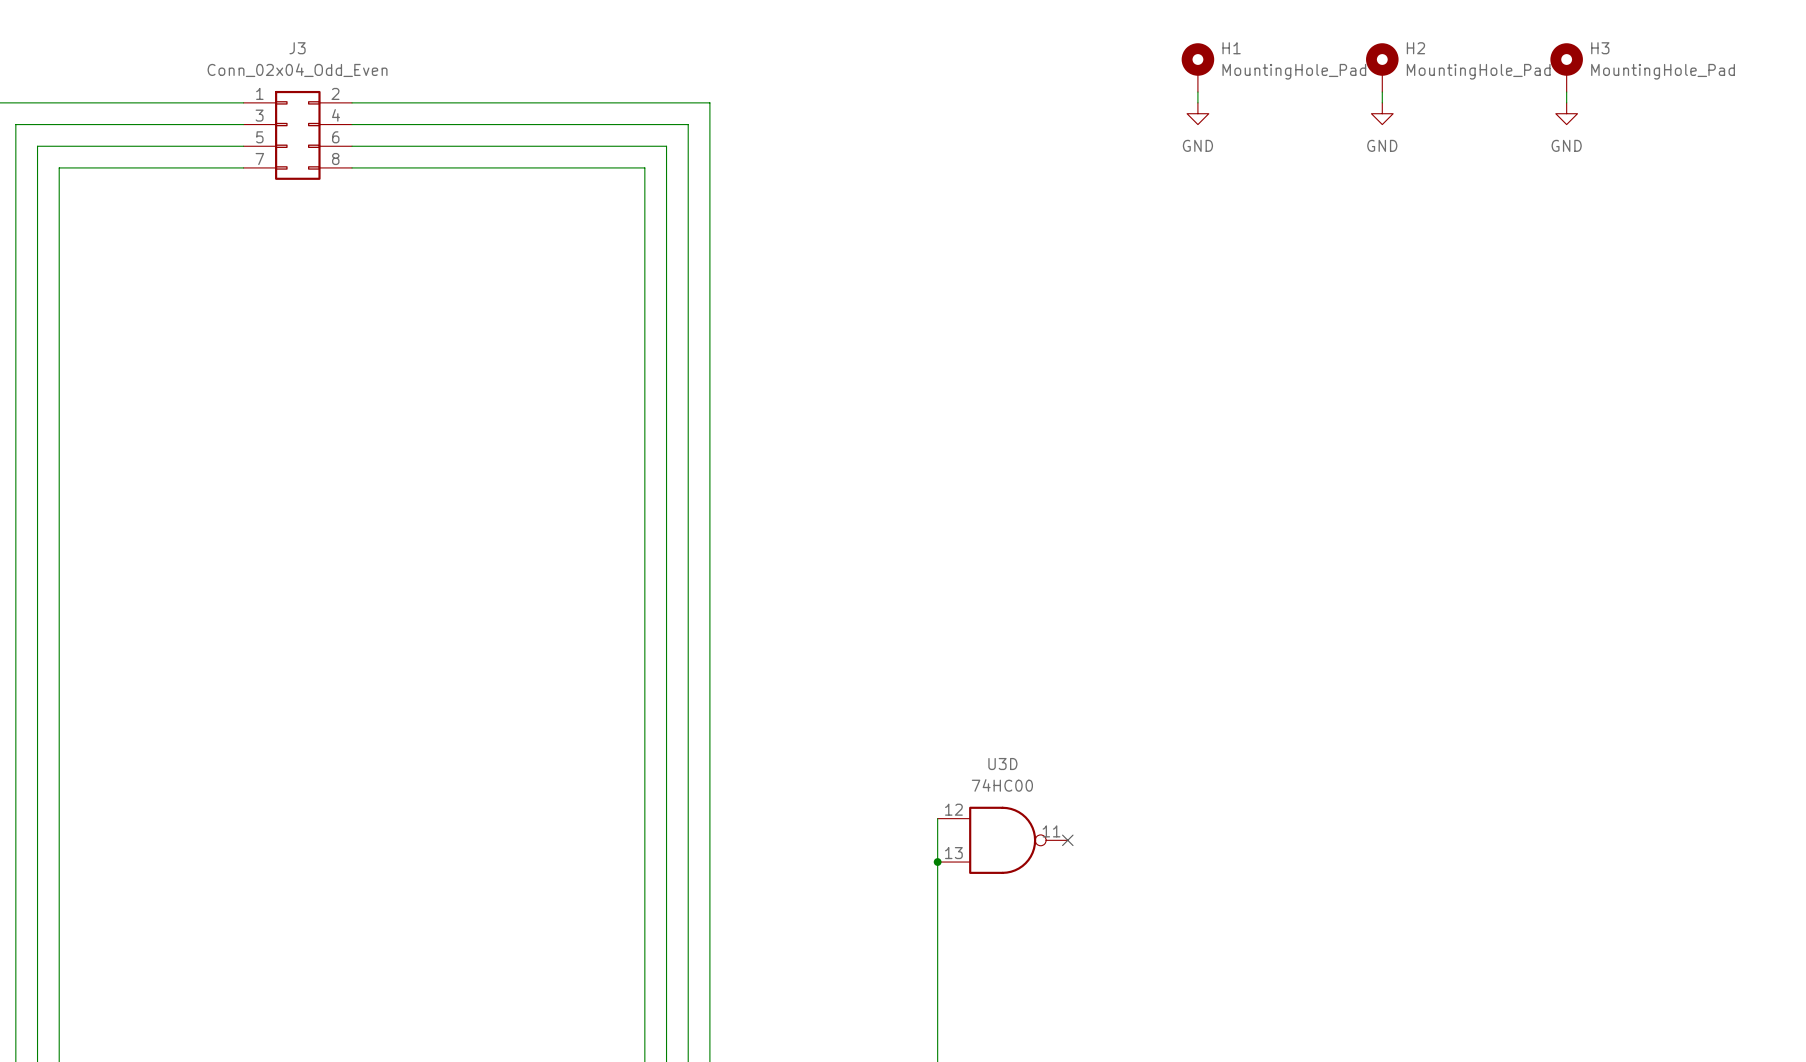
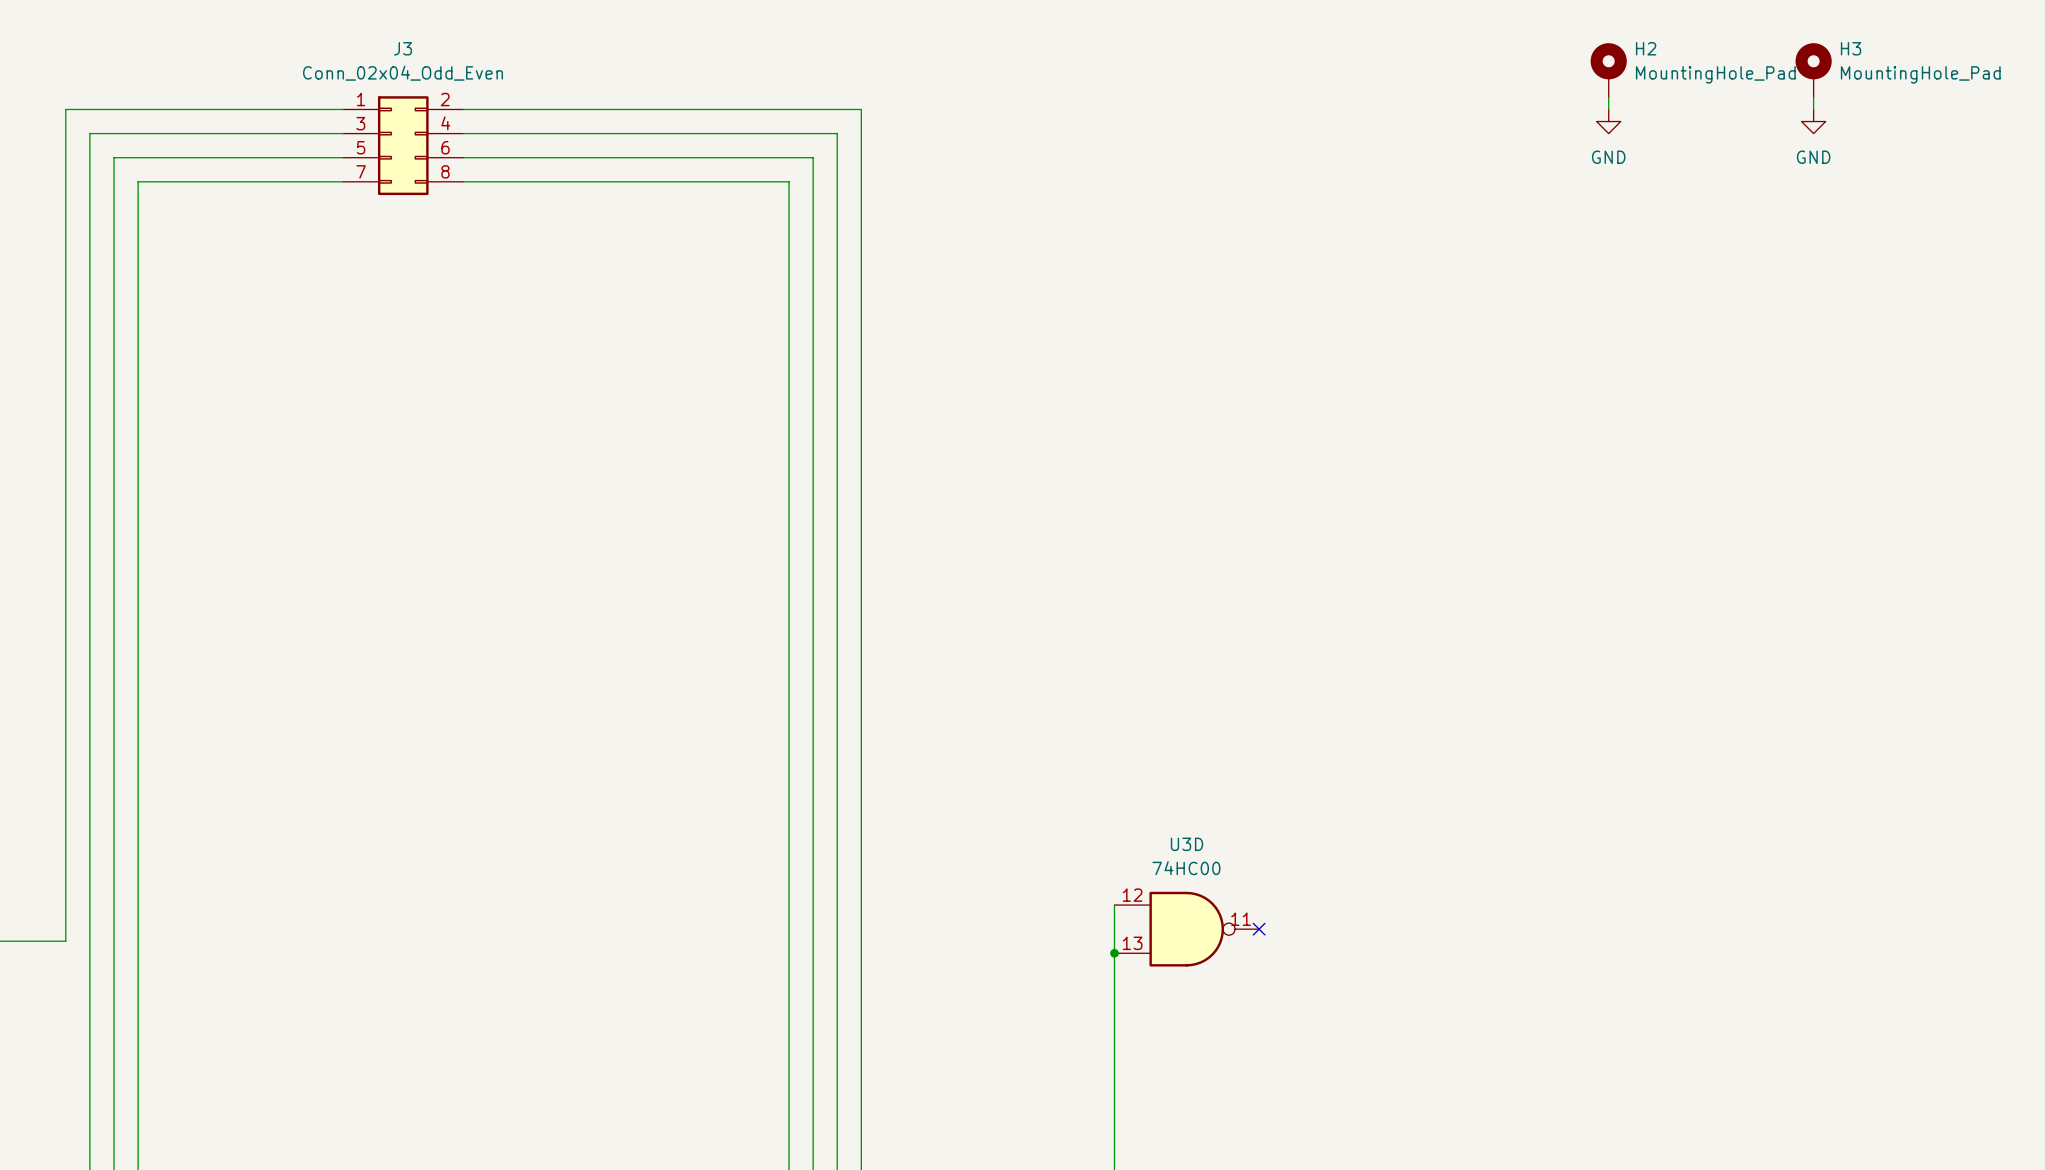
H1: MountingHole_Pad (1197, 67) -> none
wire: (1197, 92) (1197, 102) -> none
power symbol: GND (1197, 113) -> none

